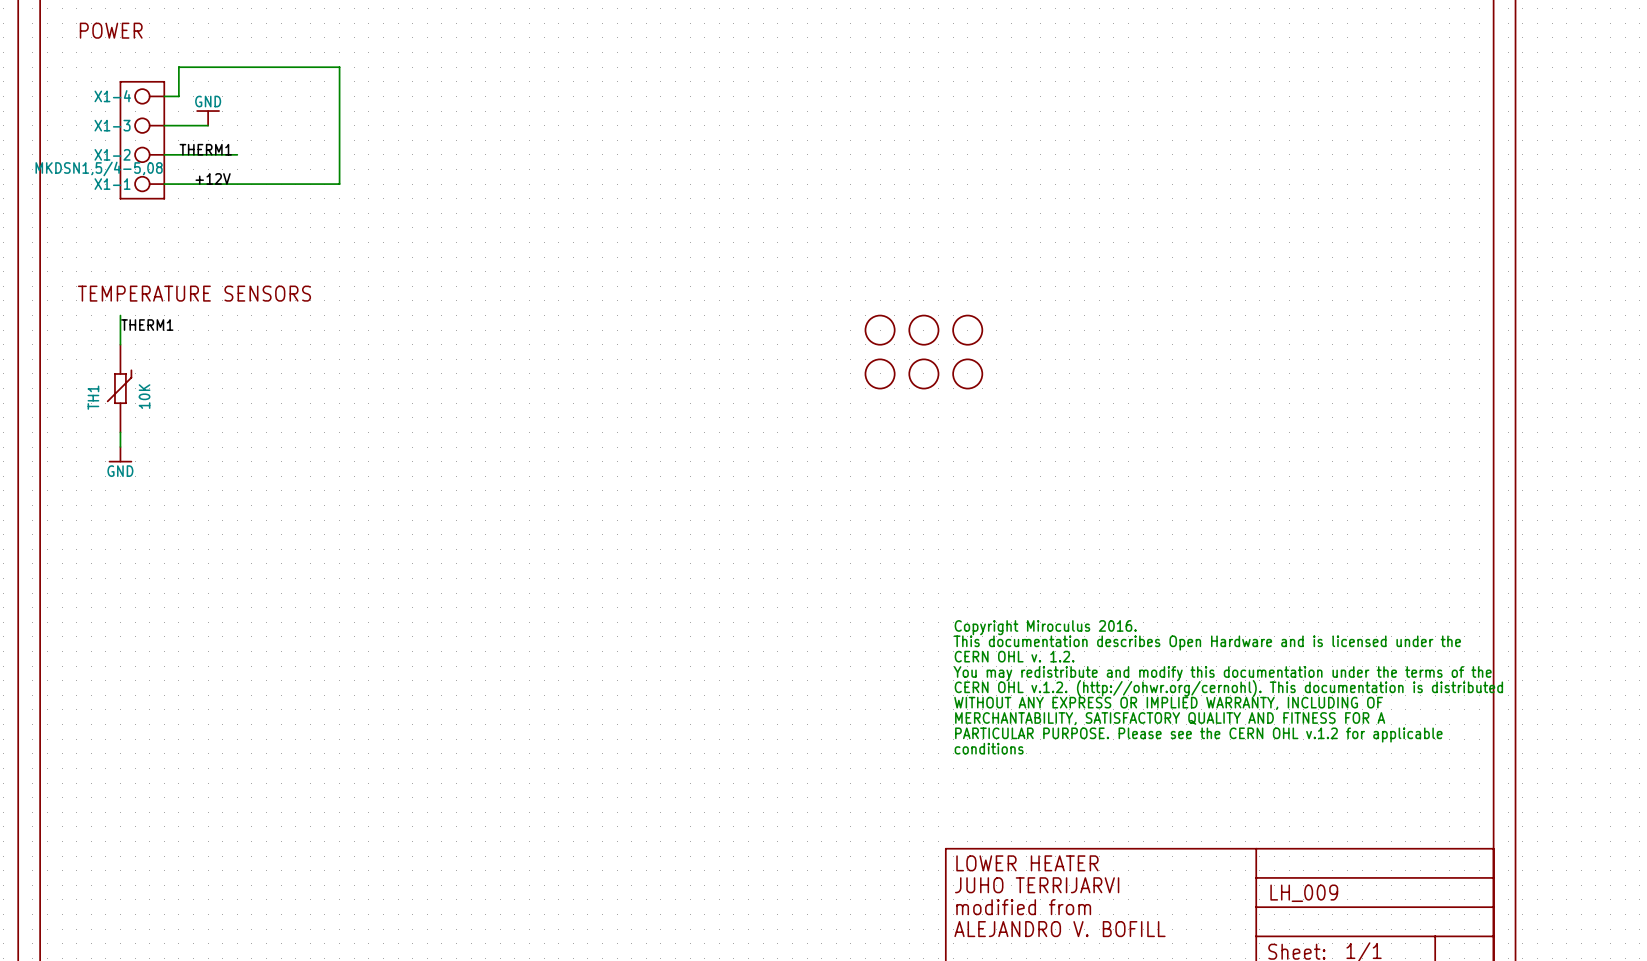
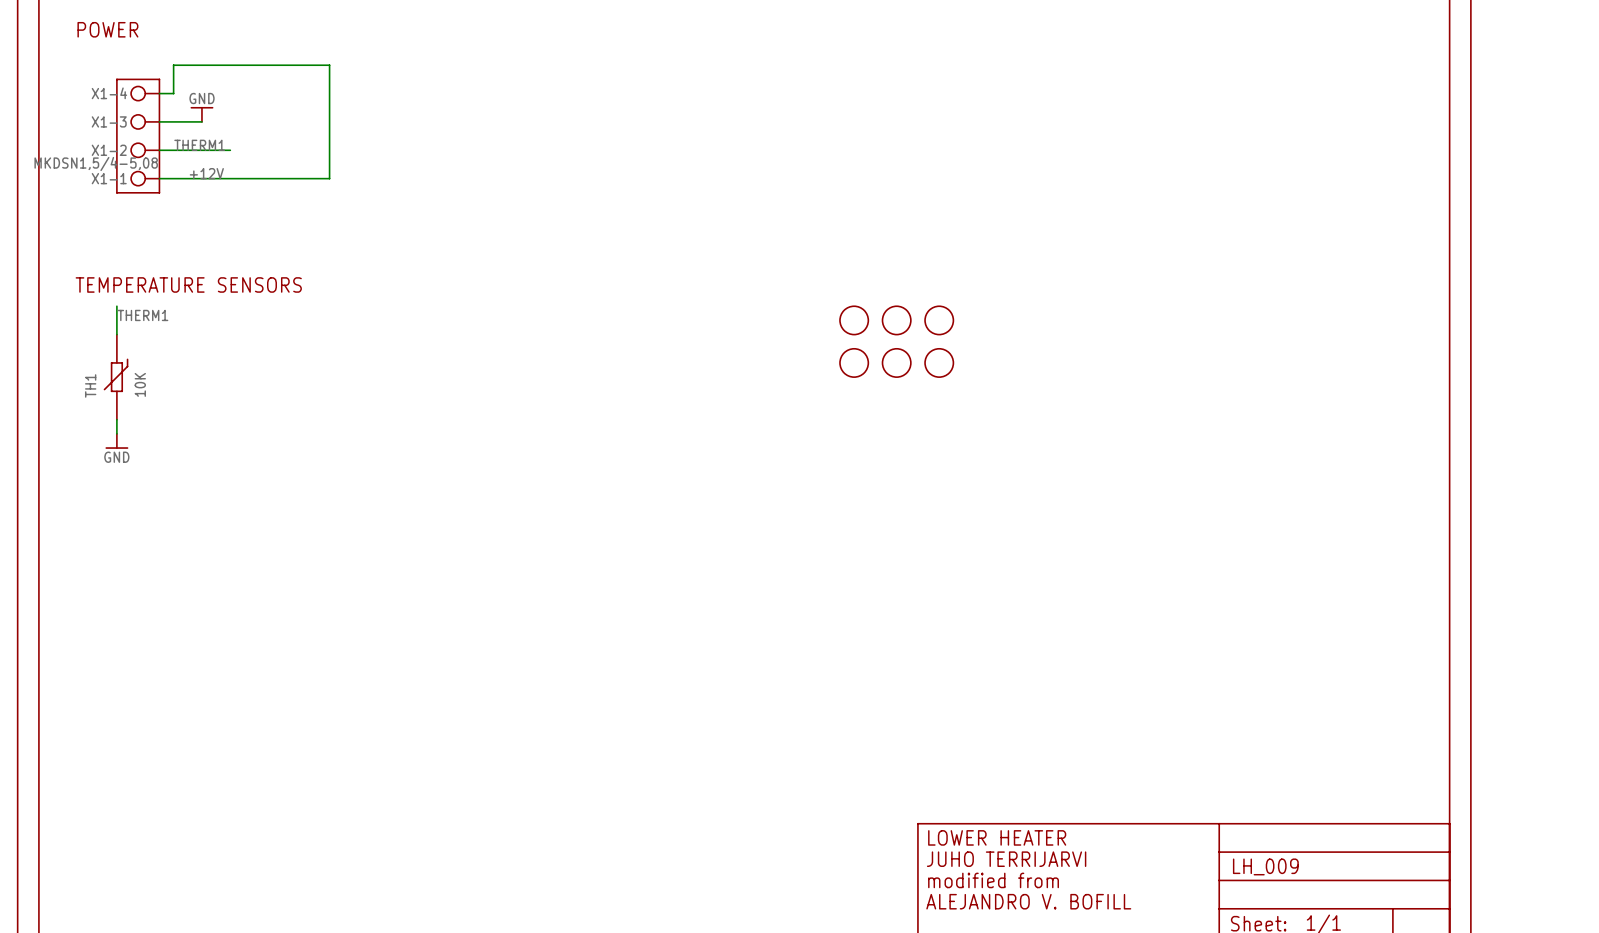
text: Copyright Miroculus 2016. (1045, 627) -> none
text: This documentation describes Open Hardware and is licensed under the (1207, 643) -> none
text: CERN OHL v. 1.2. (1014, 656) -> none
text: You may redistribute and modify this documentation under the terms of the (1222, 673) -> none
text: CERN OHL v.1.2. (http://ohwr.org/cernohl). This documentation is distributed (1228, 688) -> none
text: WITHOUT ANY EXPRESS OR IMPLIED WARRANTY, INCLUDING OF (1168, 703) -> none
text: MERCHANTABILITY, SATISFACTORY QUALITY AND FITNESS FOR A (1170, 718) -> none
text: PARTICULAR PURPOSE. Please see the CERN OHL v.1.2 for applicable (1198, 735) -> none
text: conditions (989, 748) -> none

